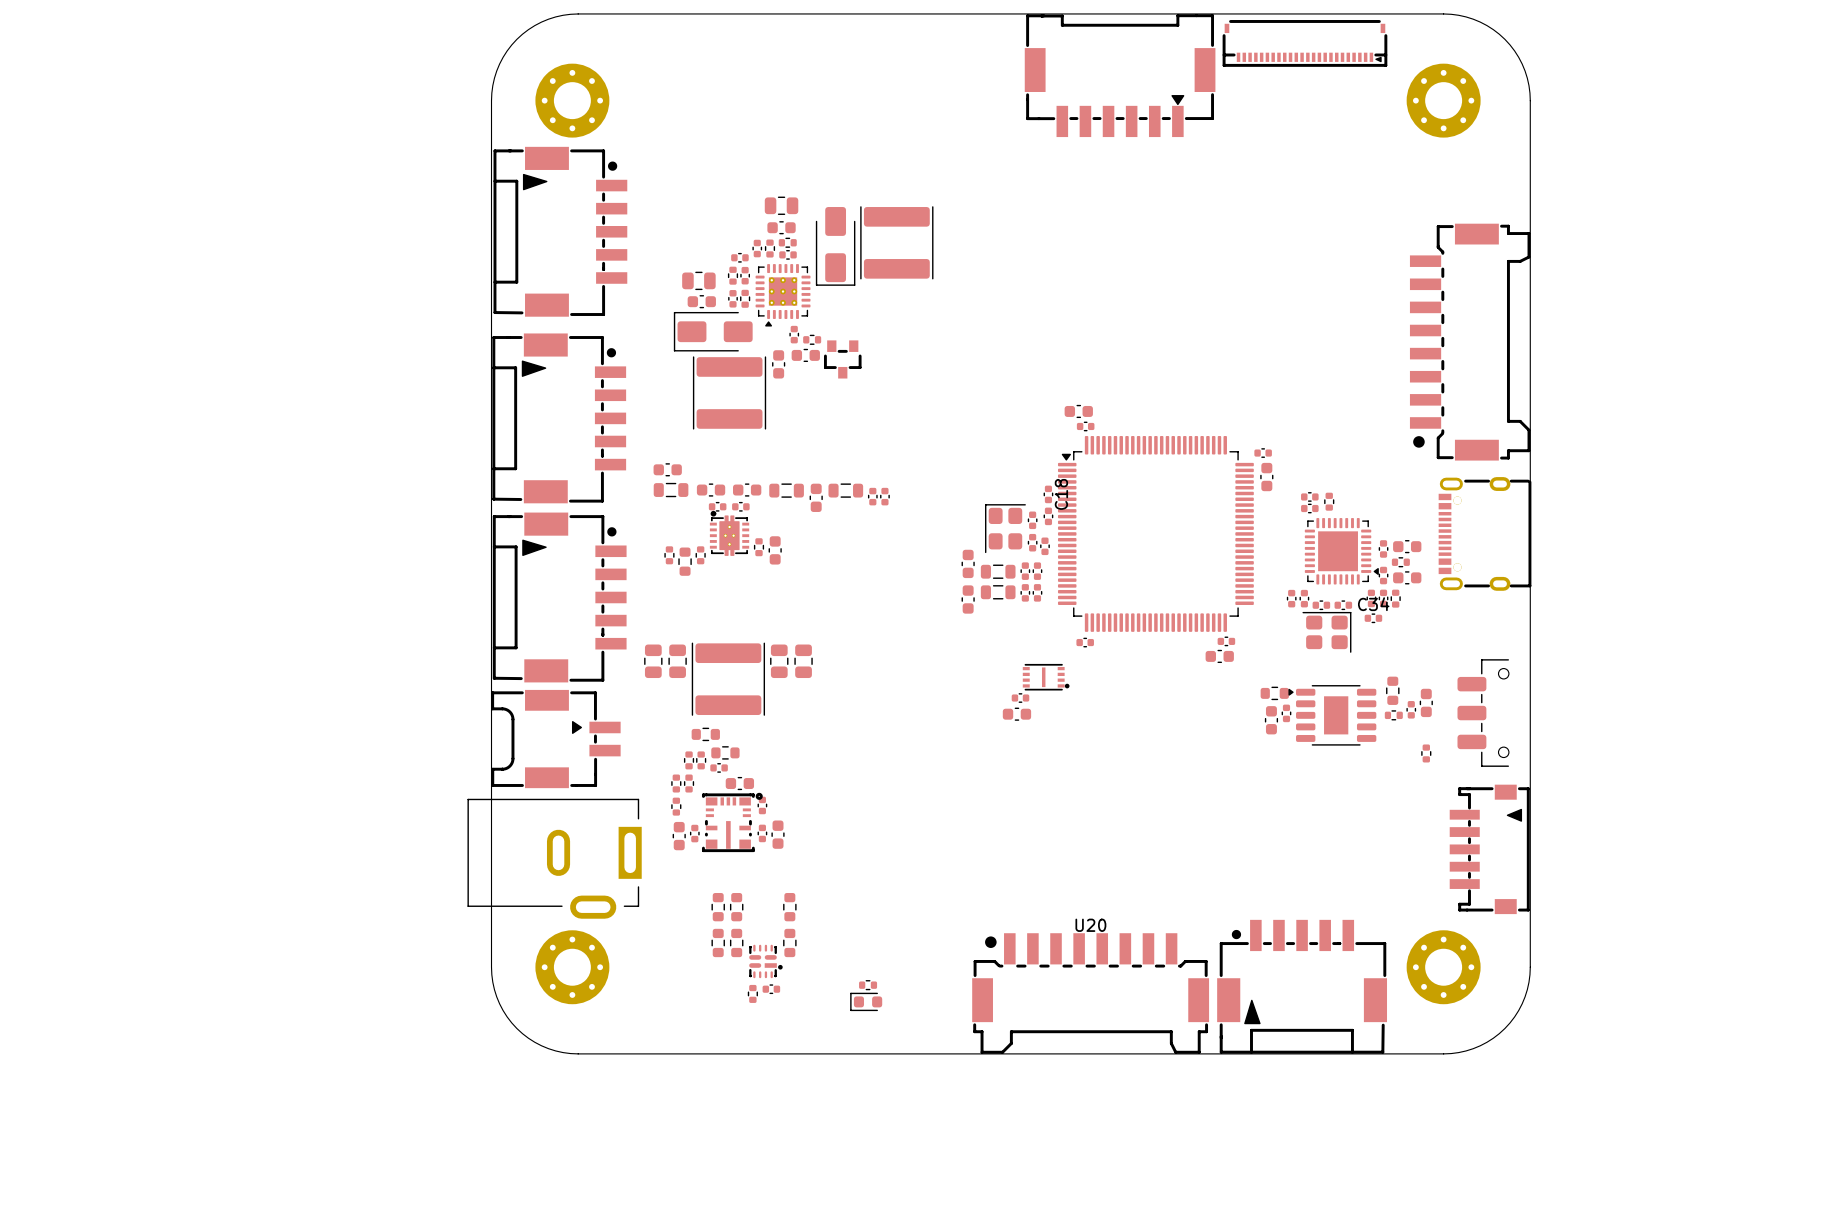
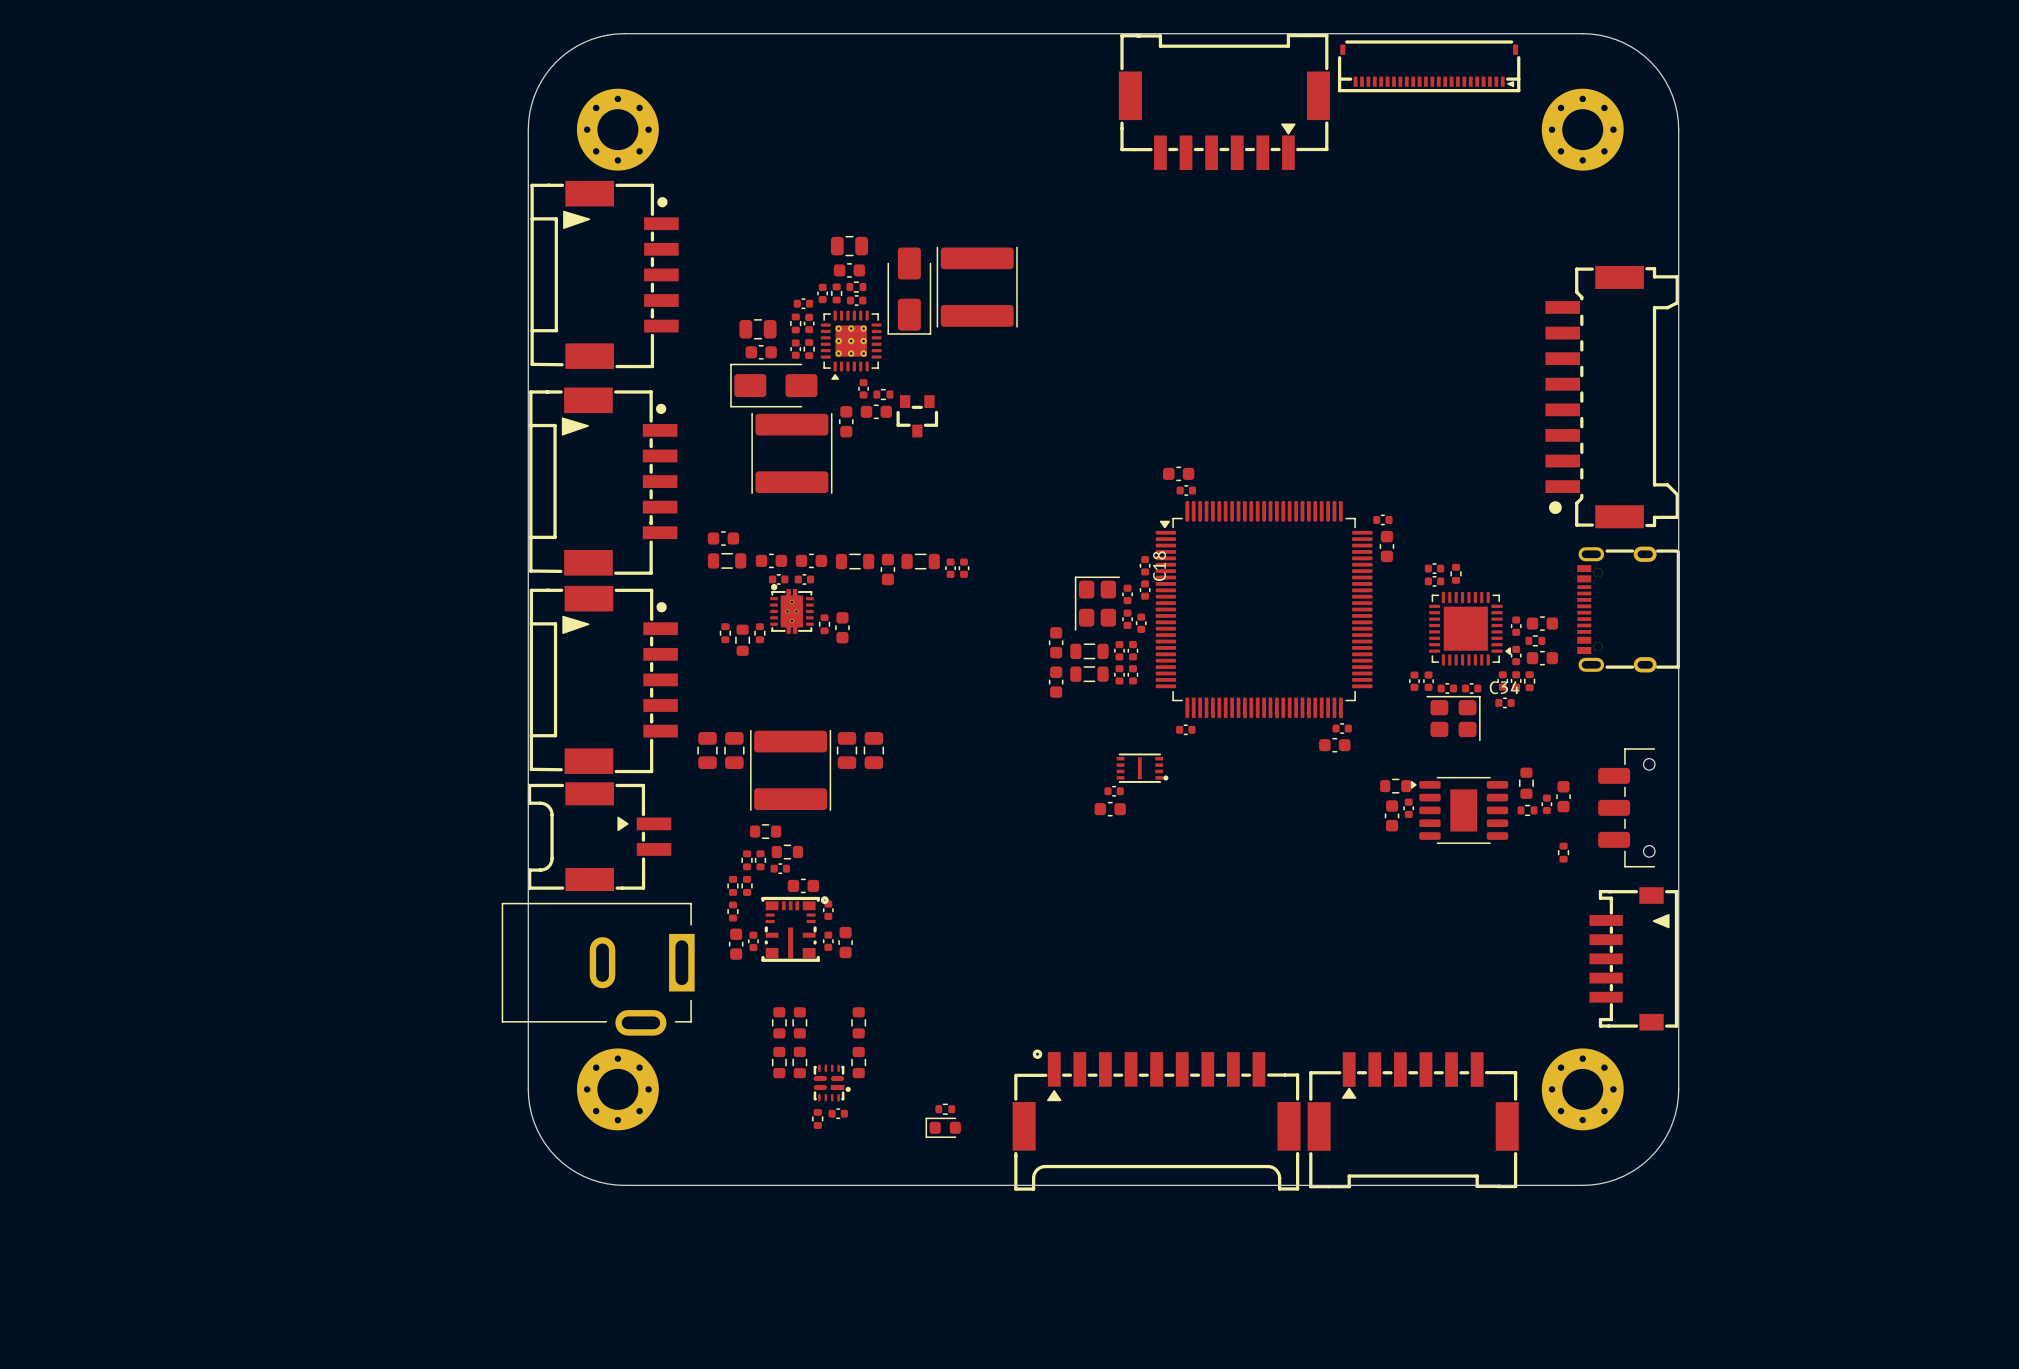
part: (1302, 986) -> none
U20: (1090, 993) -> none
part: none -> (1156, 1120)
part: none -> (1413, 1120)

